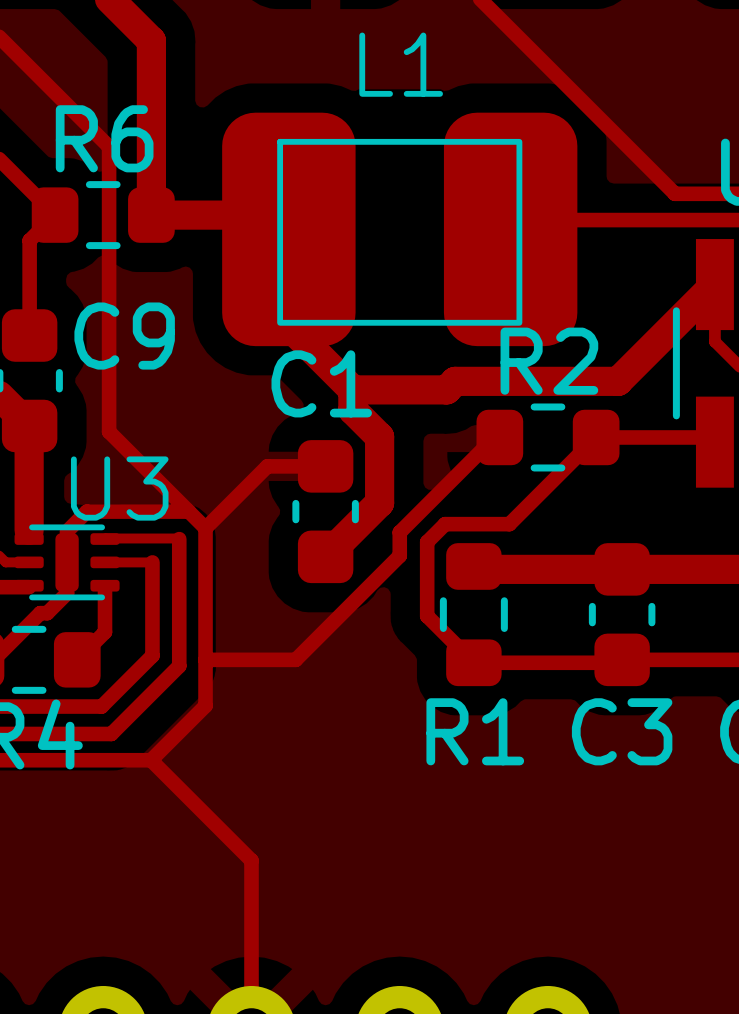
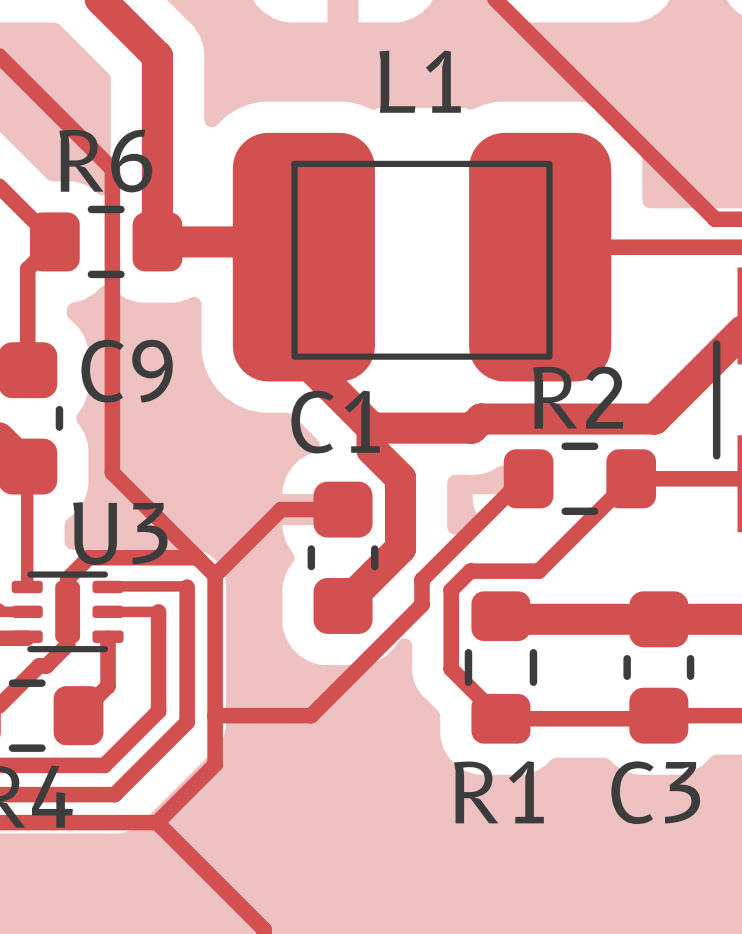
track width: thick (29, 426) (29, 530) -> thin (27, 467) (27, 577)

